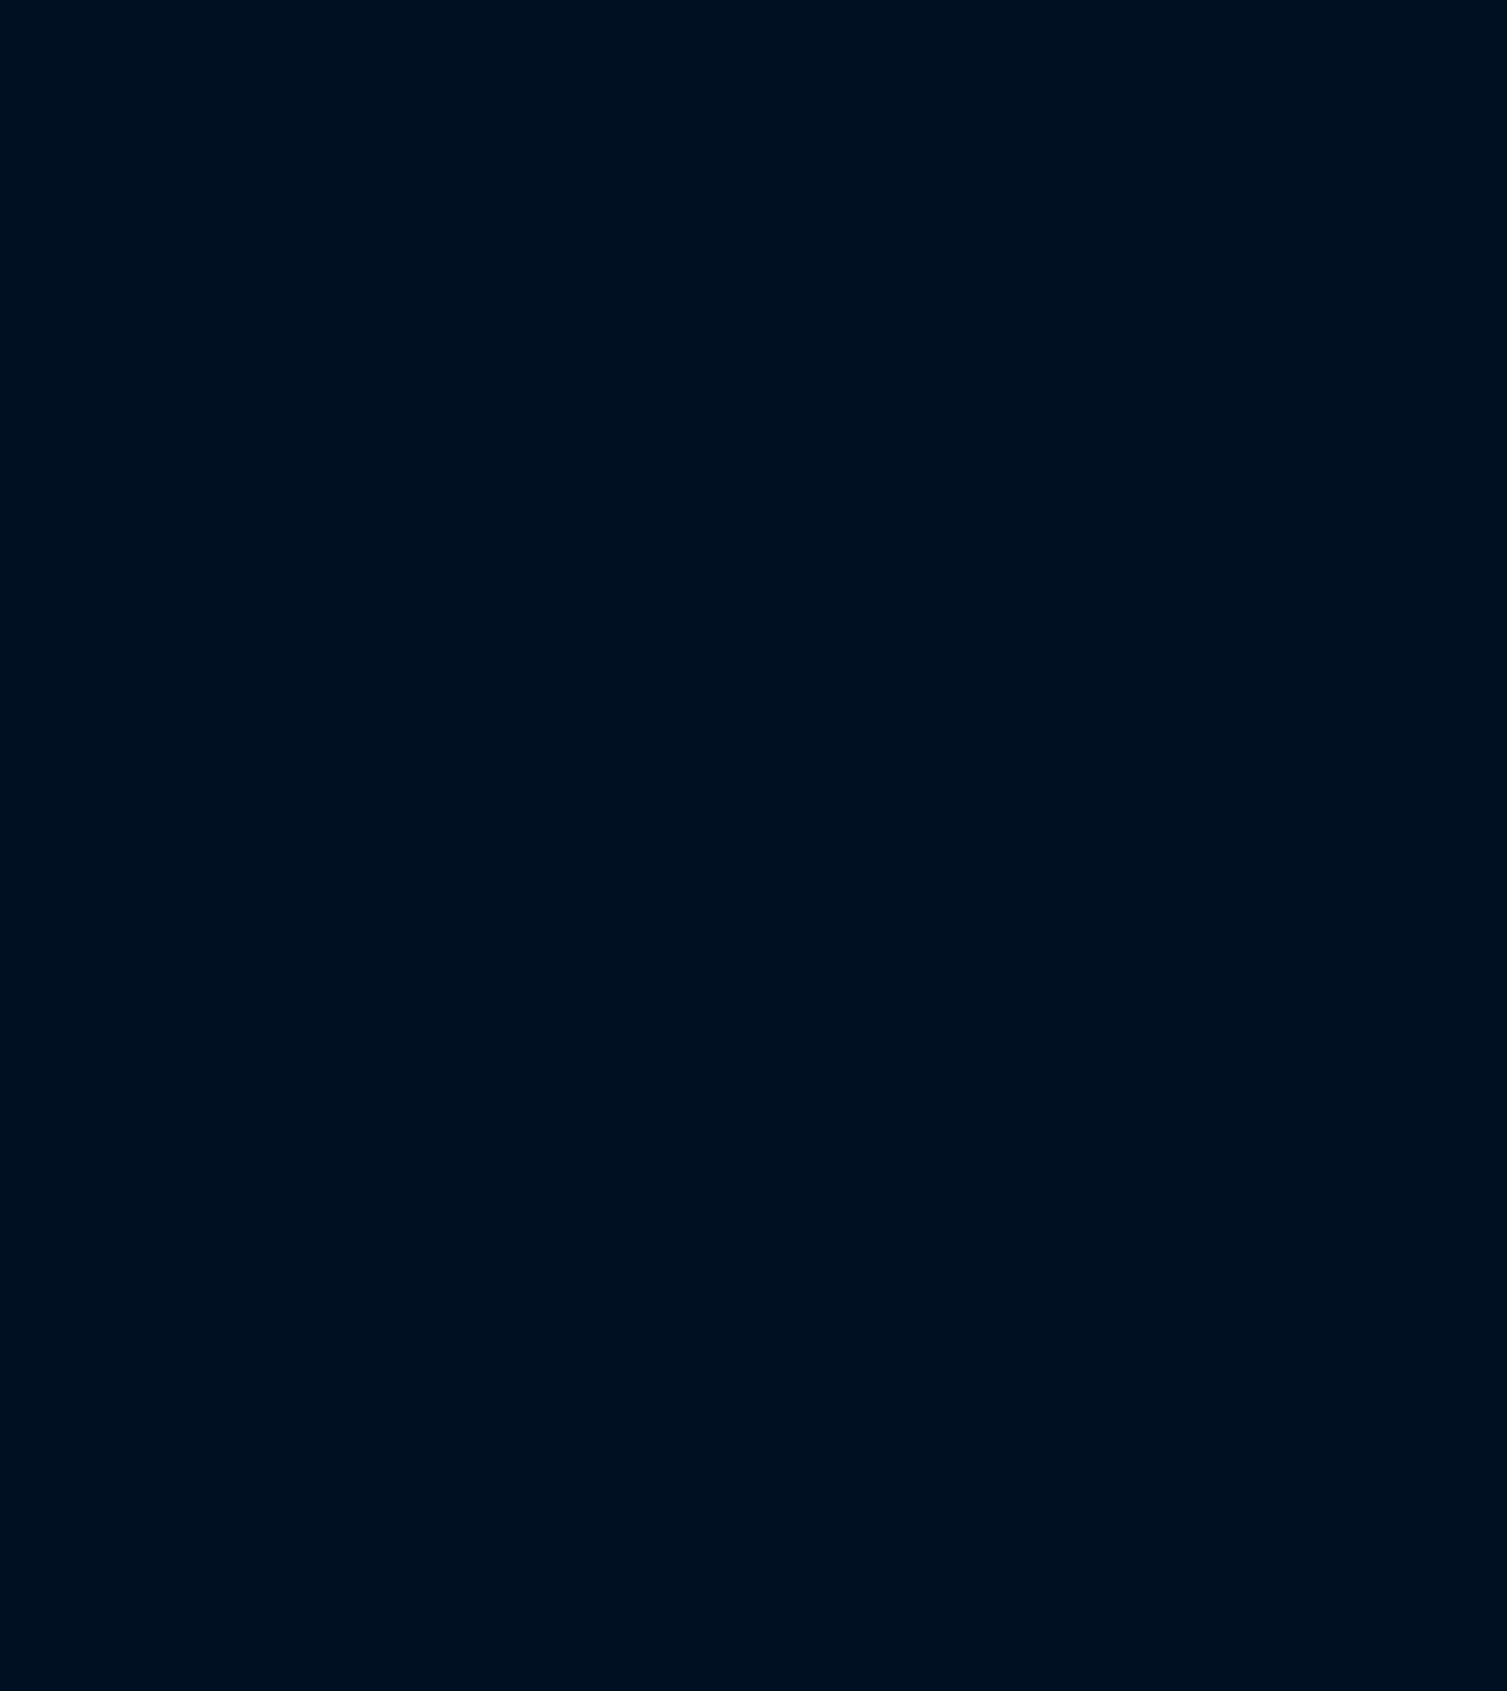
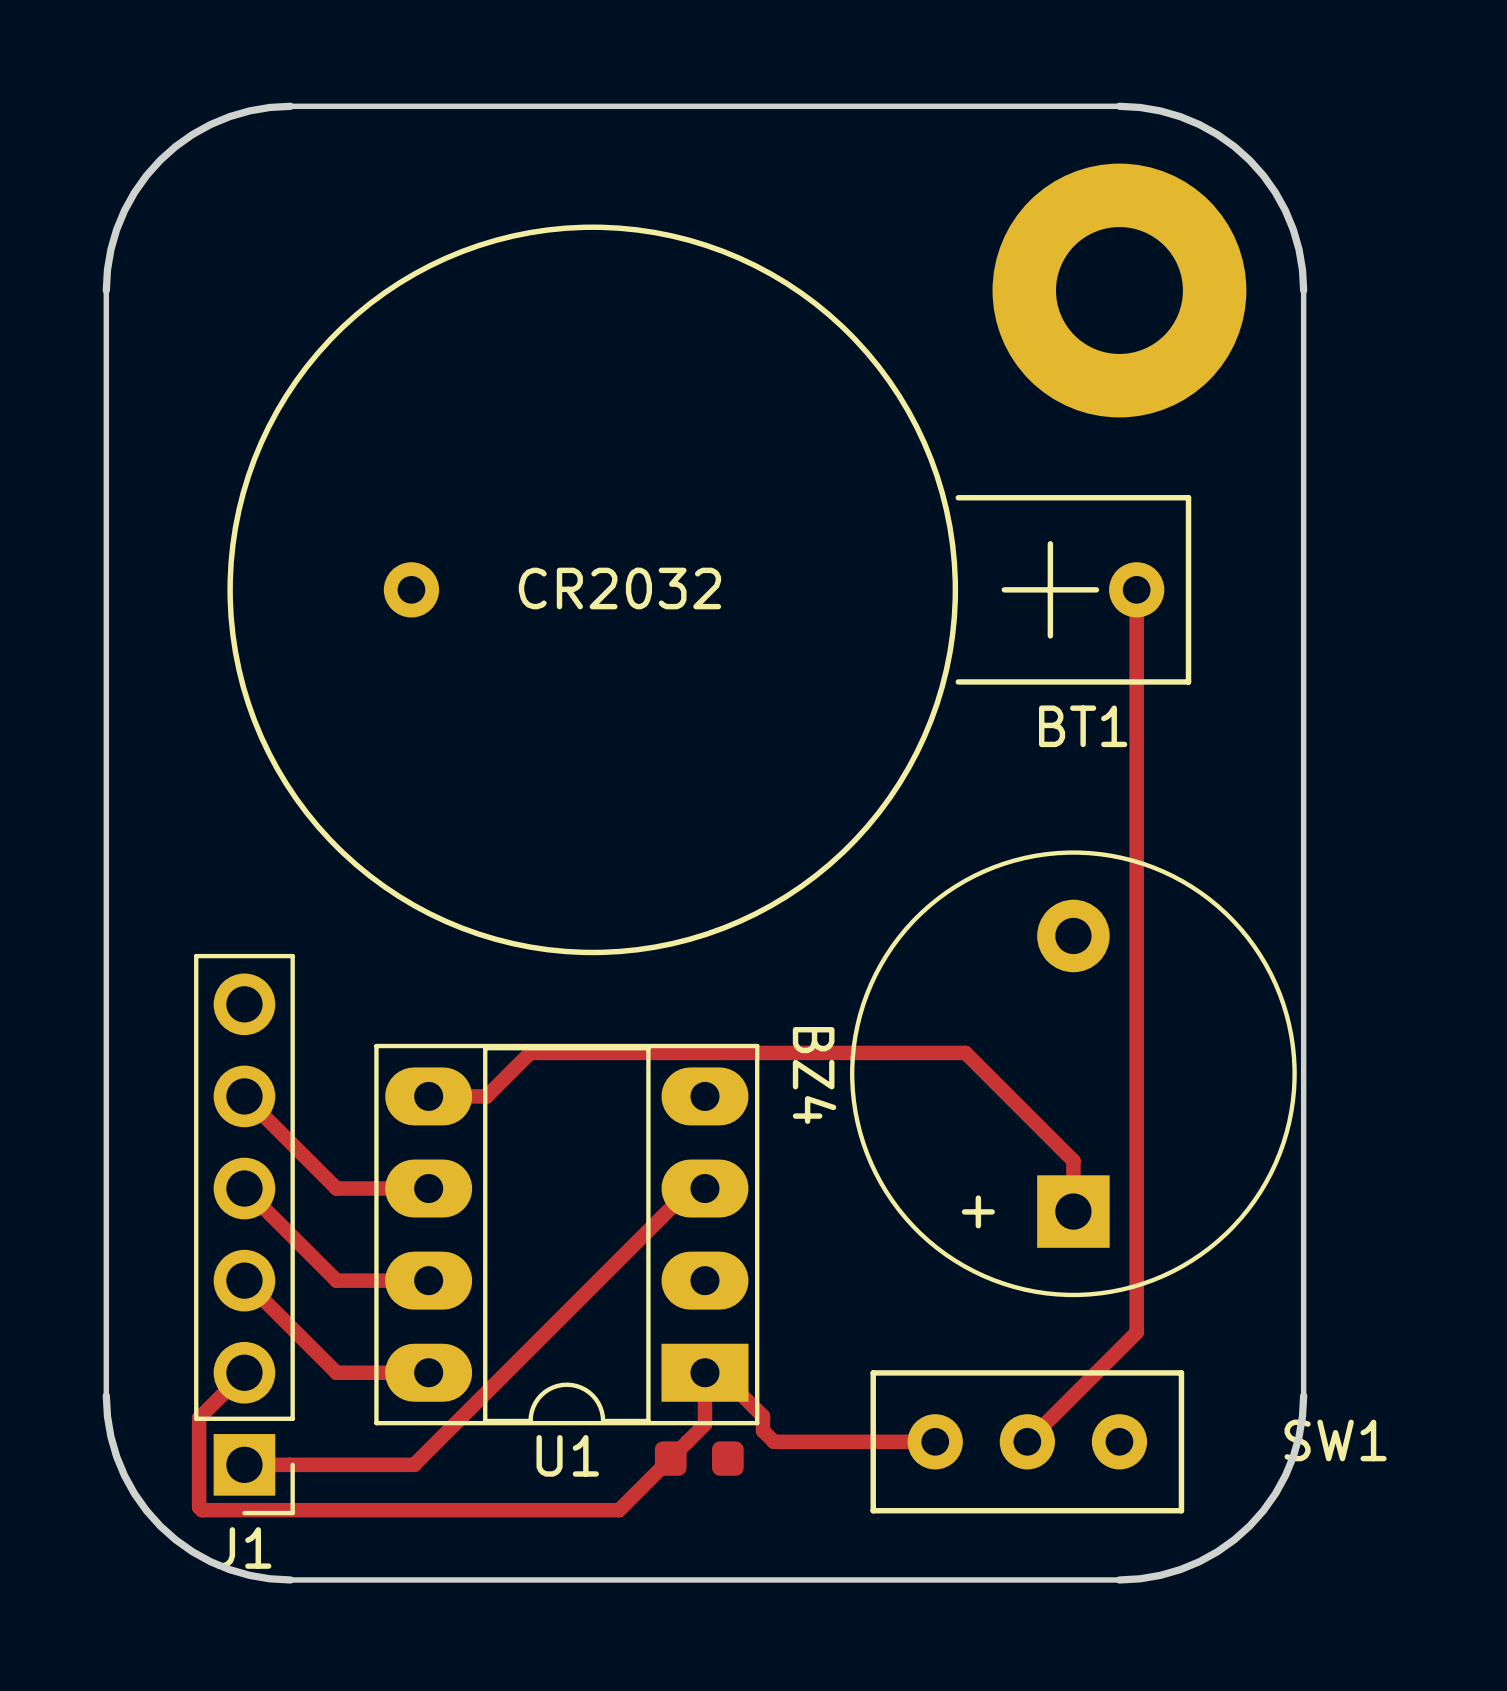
board edge: none -> (1119, 106) (269, 107) (229, 116) (192, 134) (160, 160) (134, 192) (124, 210) (110, 249) (106, 290) (106, 1395) (107, 1416) (116, 1456) (134, 1493) (160, 1526) (192, 1551) (210, 1561) (249, 1575) (290, 1579) (1119, 1579) (1160, 1575) (1199, 1561) (1234, 1539) (1263, 1510) (1275, 1493) (1293, 1456) (1299, 1436) (1303, 1395) (1302, 269) (1293, 229) (1285, 210) (1263, 175) (1249, 160) (1217, 134) (1180, 116) (1140, 107) (1119, 106)
part: none -> (1119, 290)
BT1: none -> (709, 589)
top track: none -> (1136, 589) (1136, 1332) (1027, 1441)
BZ4: none -> (1073, 1073)
top track: none -> (244, 1096) (336, 1188) (428, 1188)
top track: none -> (428, 1096) (486, 1096) (530, 1052) (965, 1052) (1073, 1160) (1073, 1211)
top track: none -> (244, 1188) (336, 1280) (428, 1280)
top track: none -> (704, 1188) (690, 1188) (414, 1464) (244, 1464)
J1: none -> (244, 1234)
U1: none -> (566, 1234)
top track: none -> (244, 1280) (336, 1372) (428, 1372)
top track: none -> (244, 1372) (199, 1418) (199, 1507) (202, 1510) (619, 1510) (704, 1424) (704, 1372) (719, 1372) (763, 1416) (763, 1430) (774, 1441) (935, 1441)
SW1: none -> (1027, 1441)
part: none -> (699, 1458)

